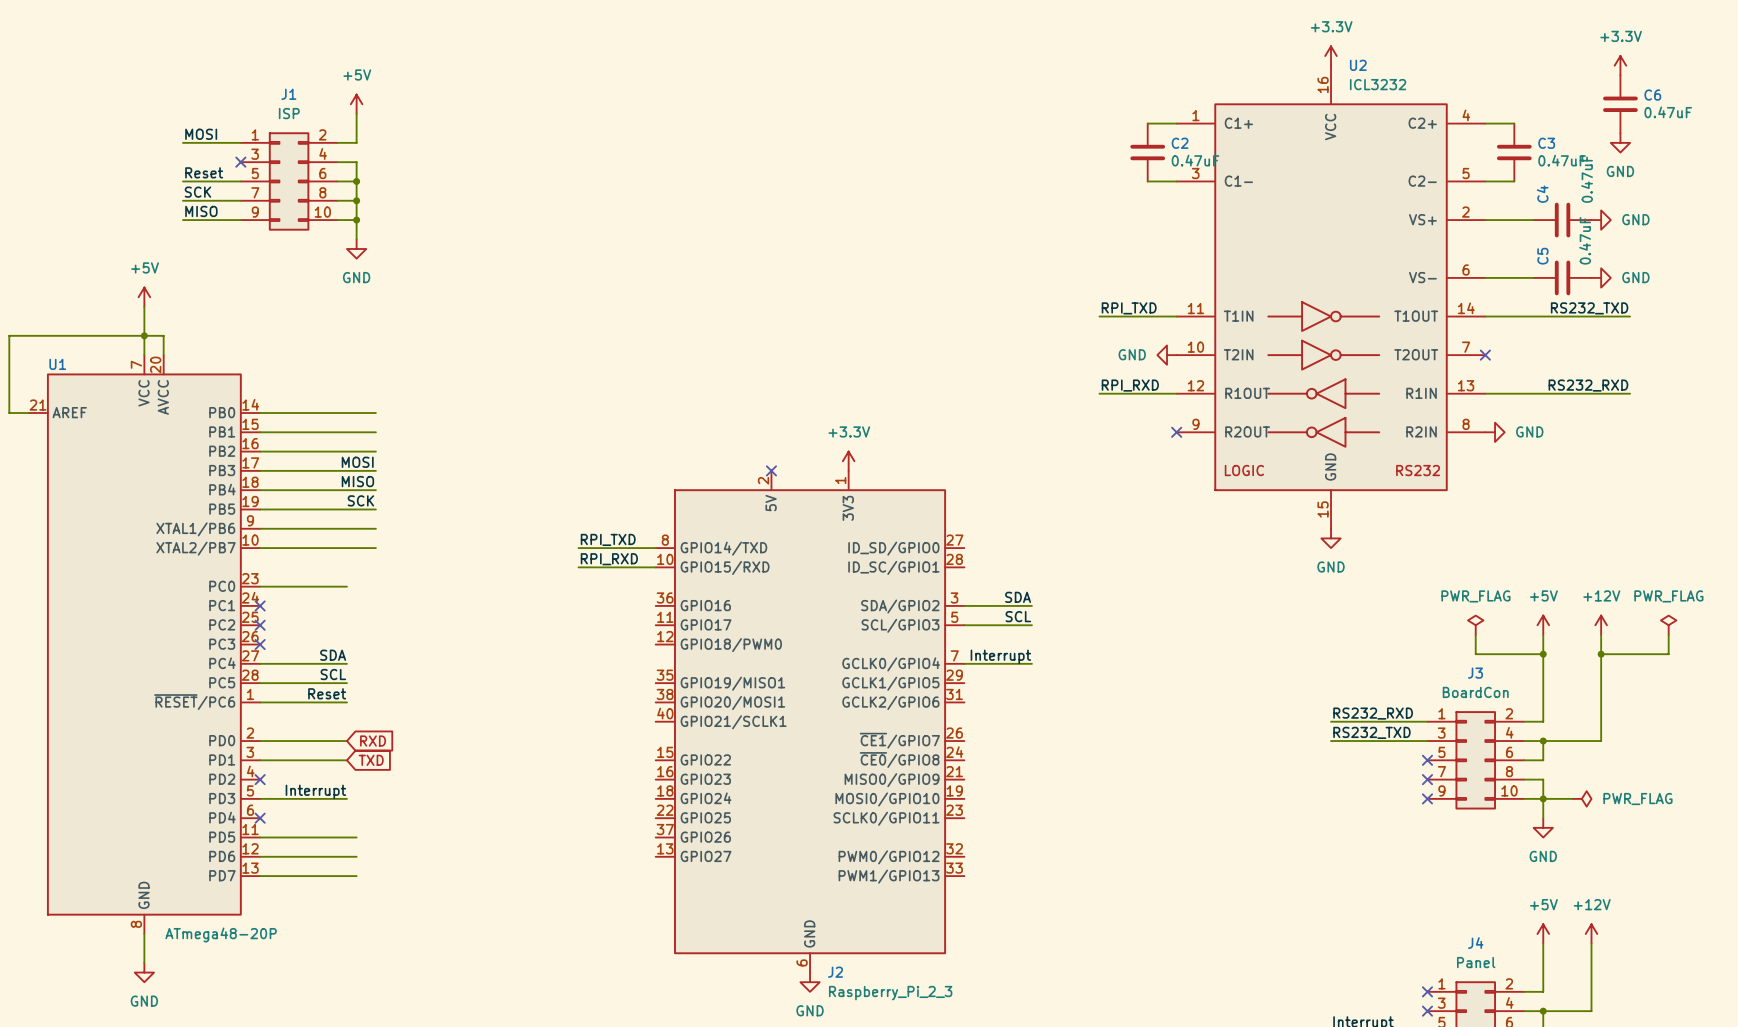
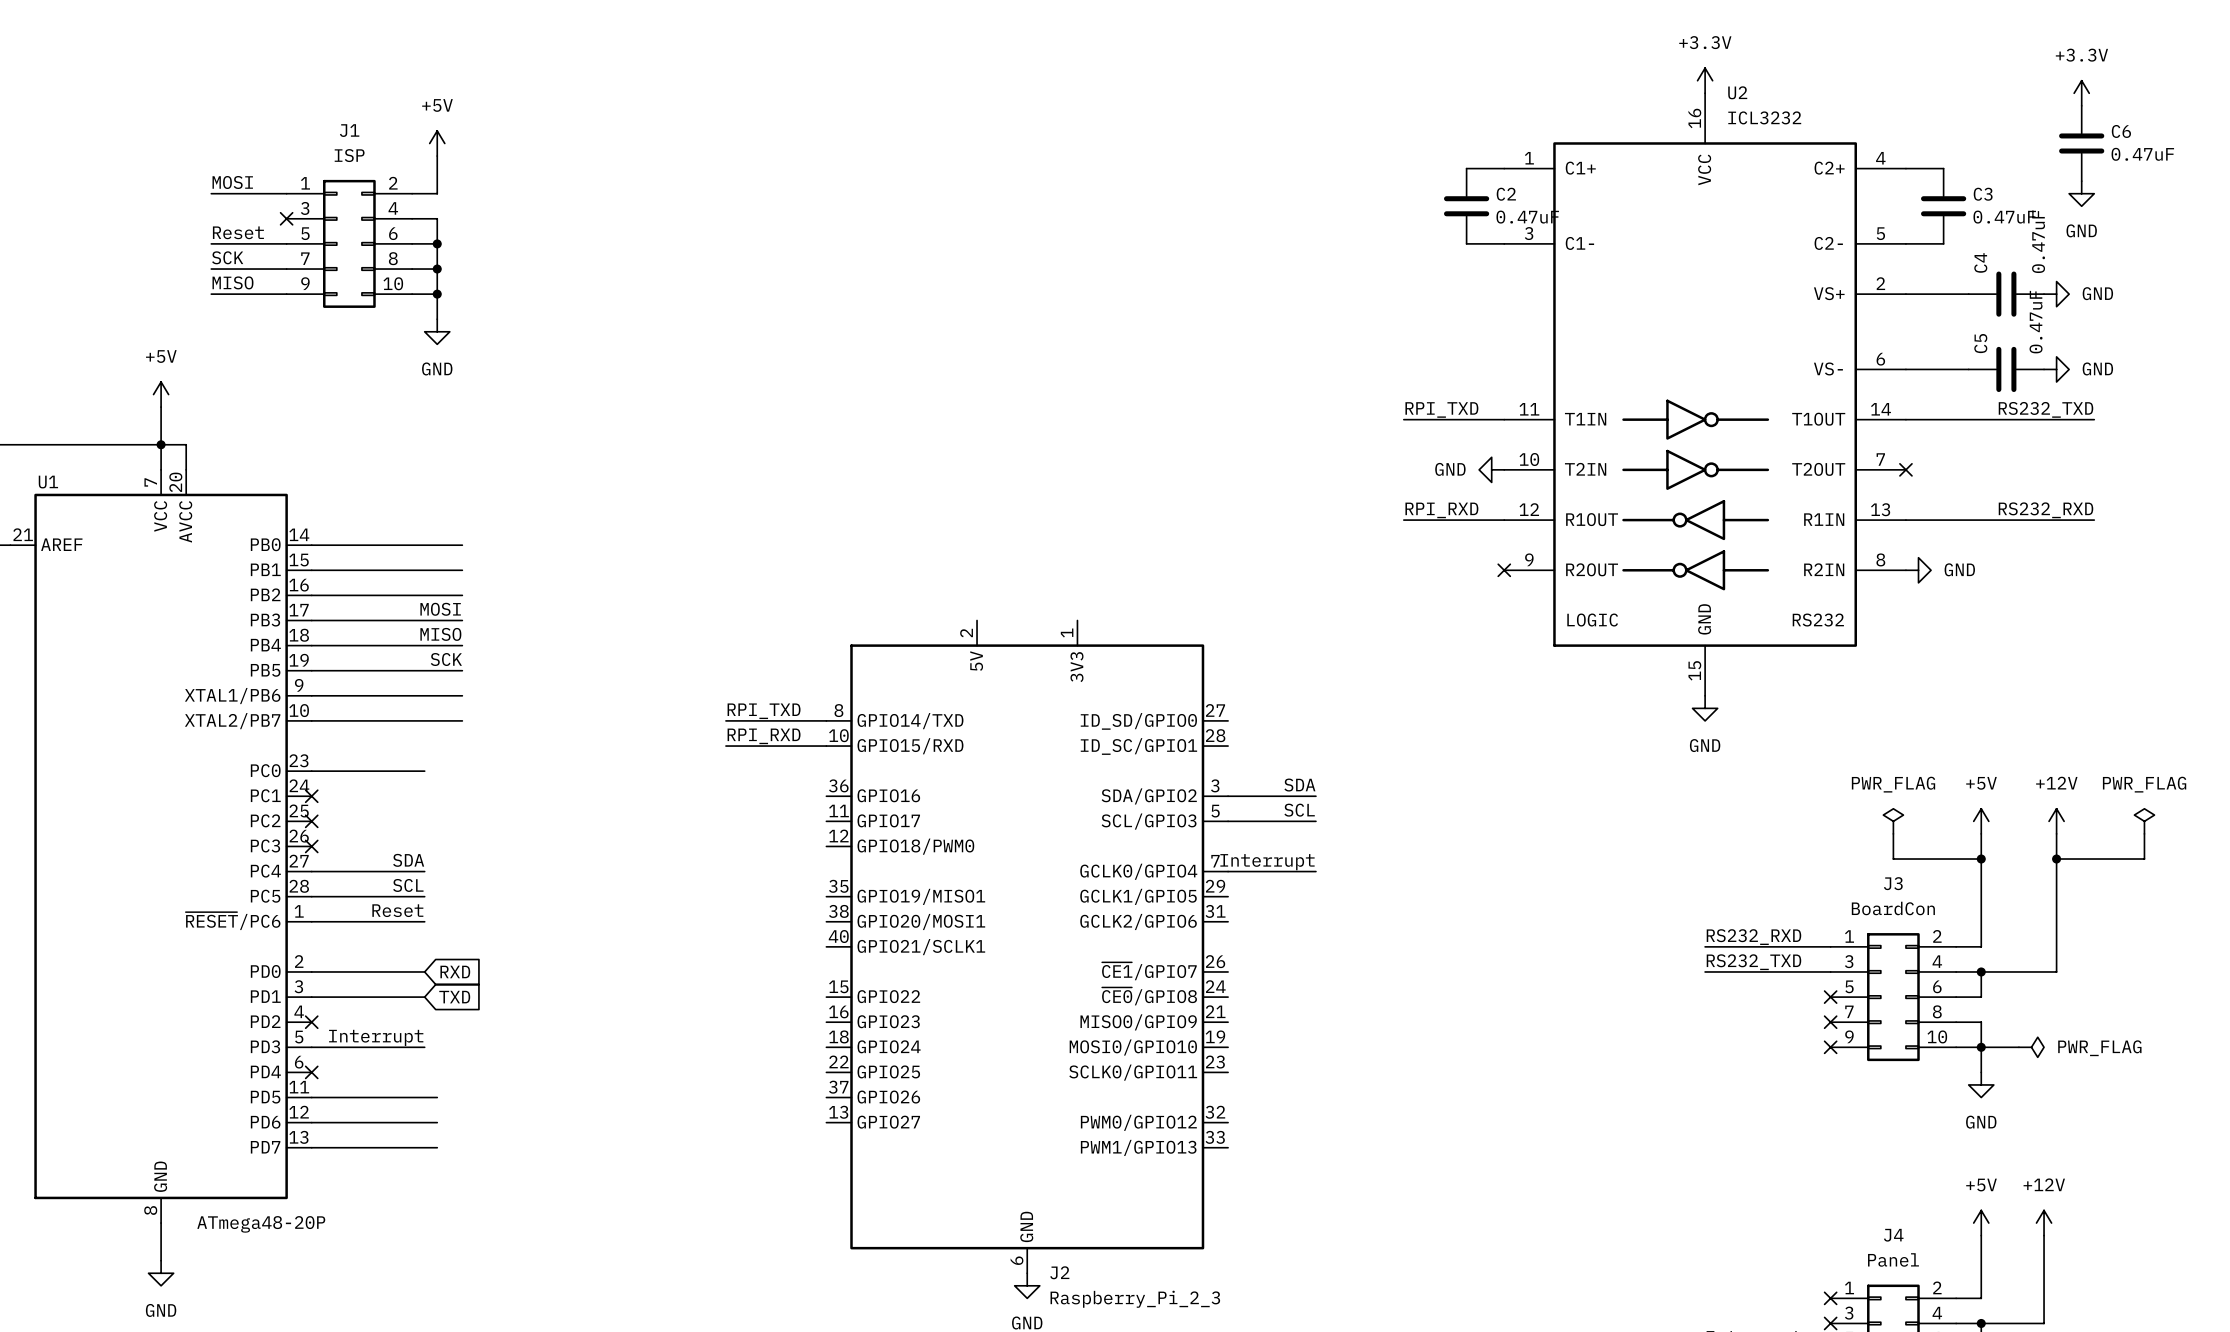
power symbol: +3.3V (848, 461) -> none
no-connect mark: (771, 470) -> none

